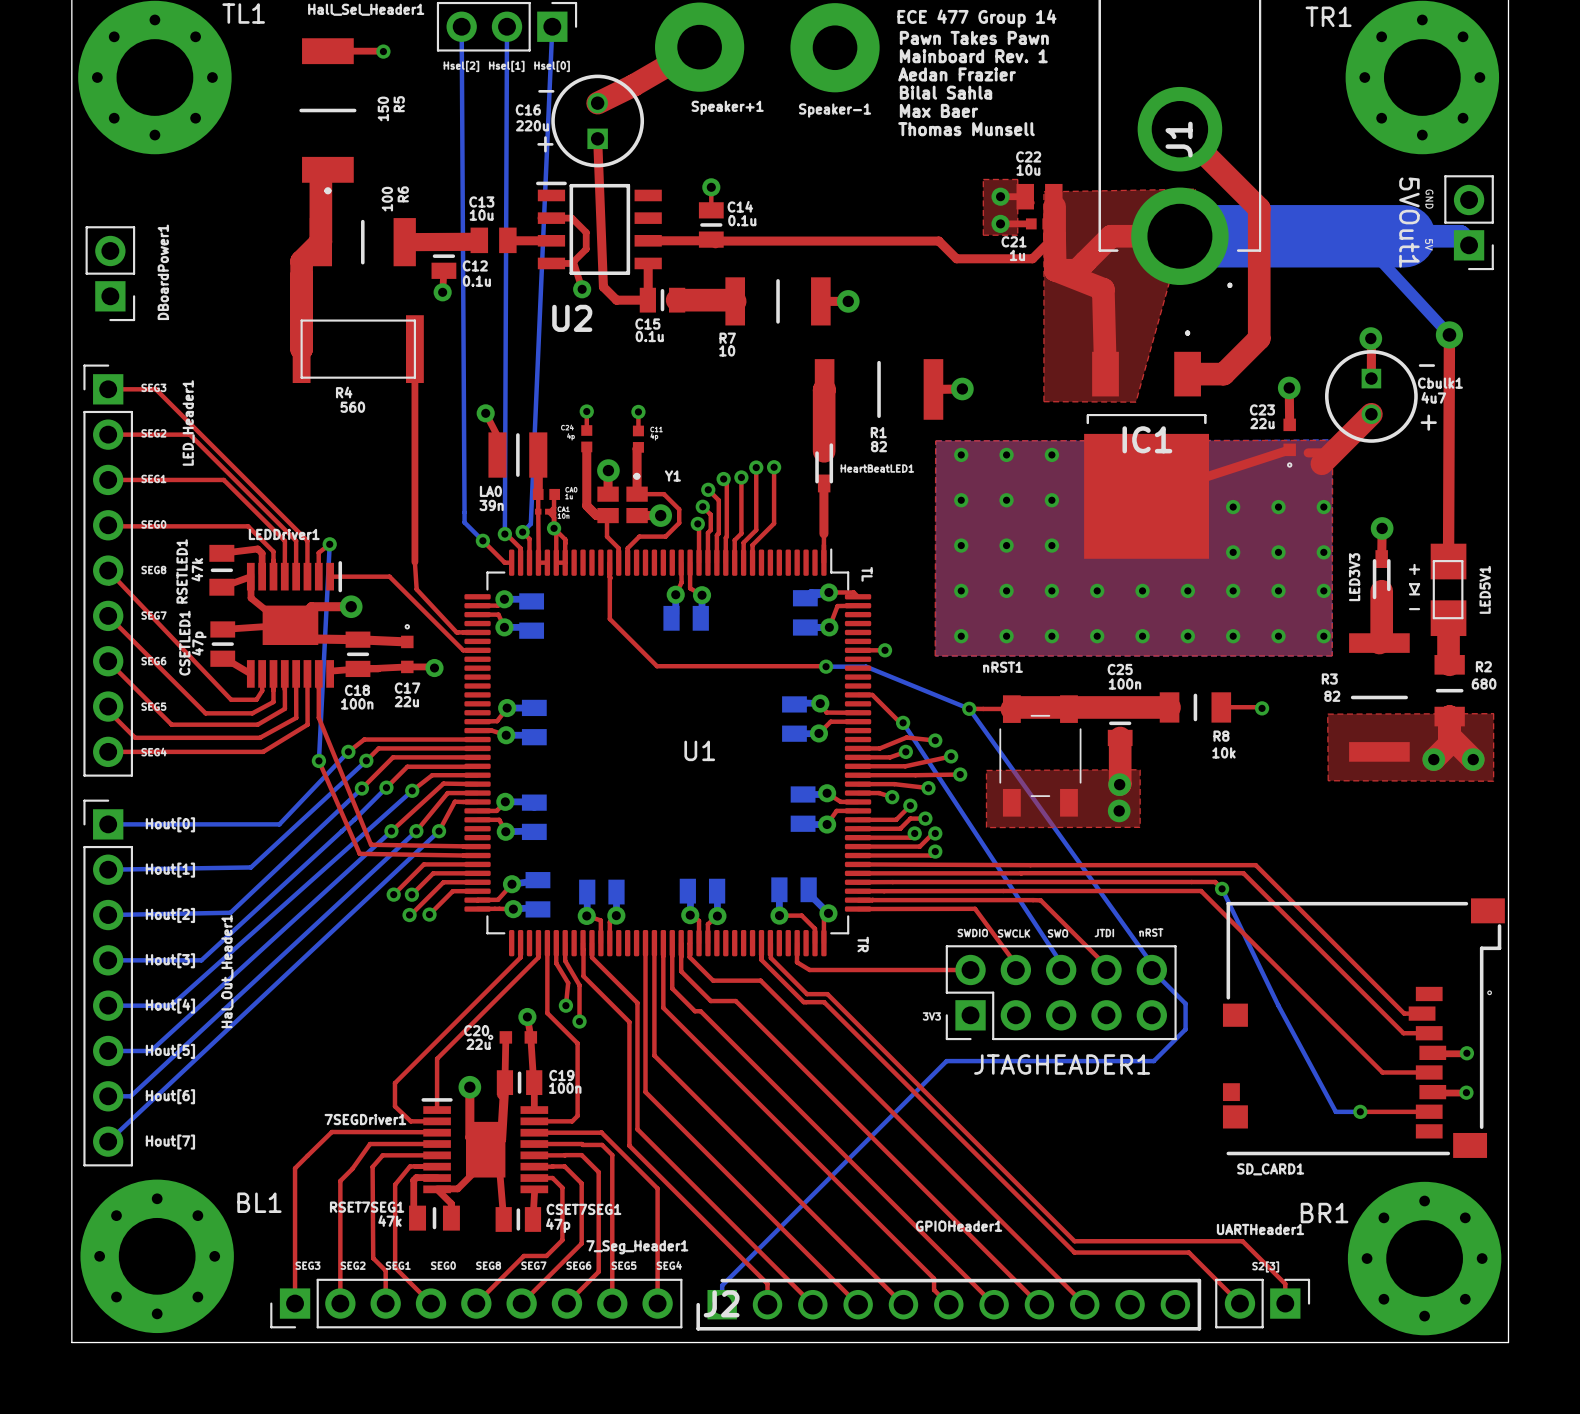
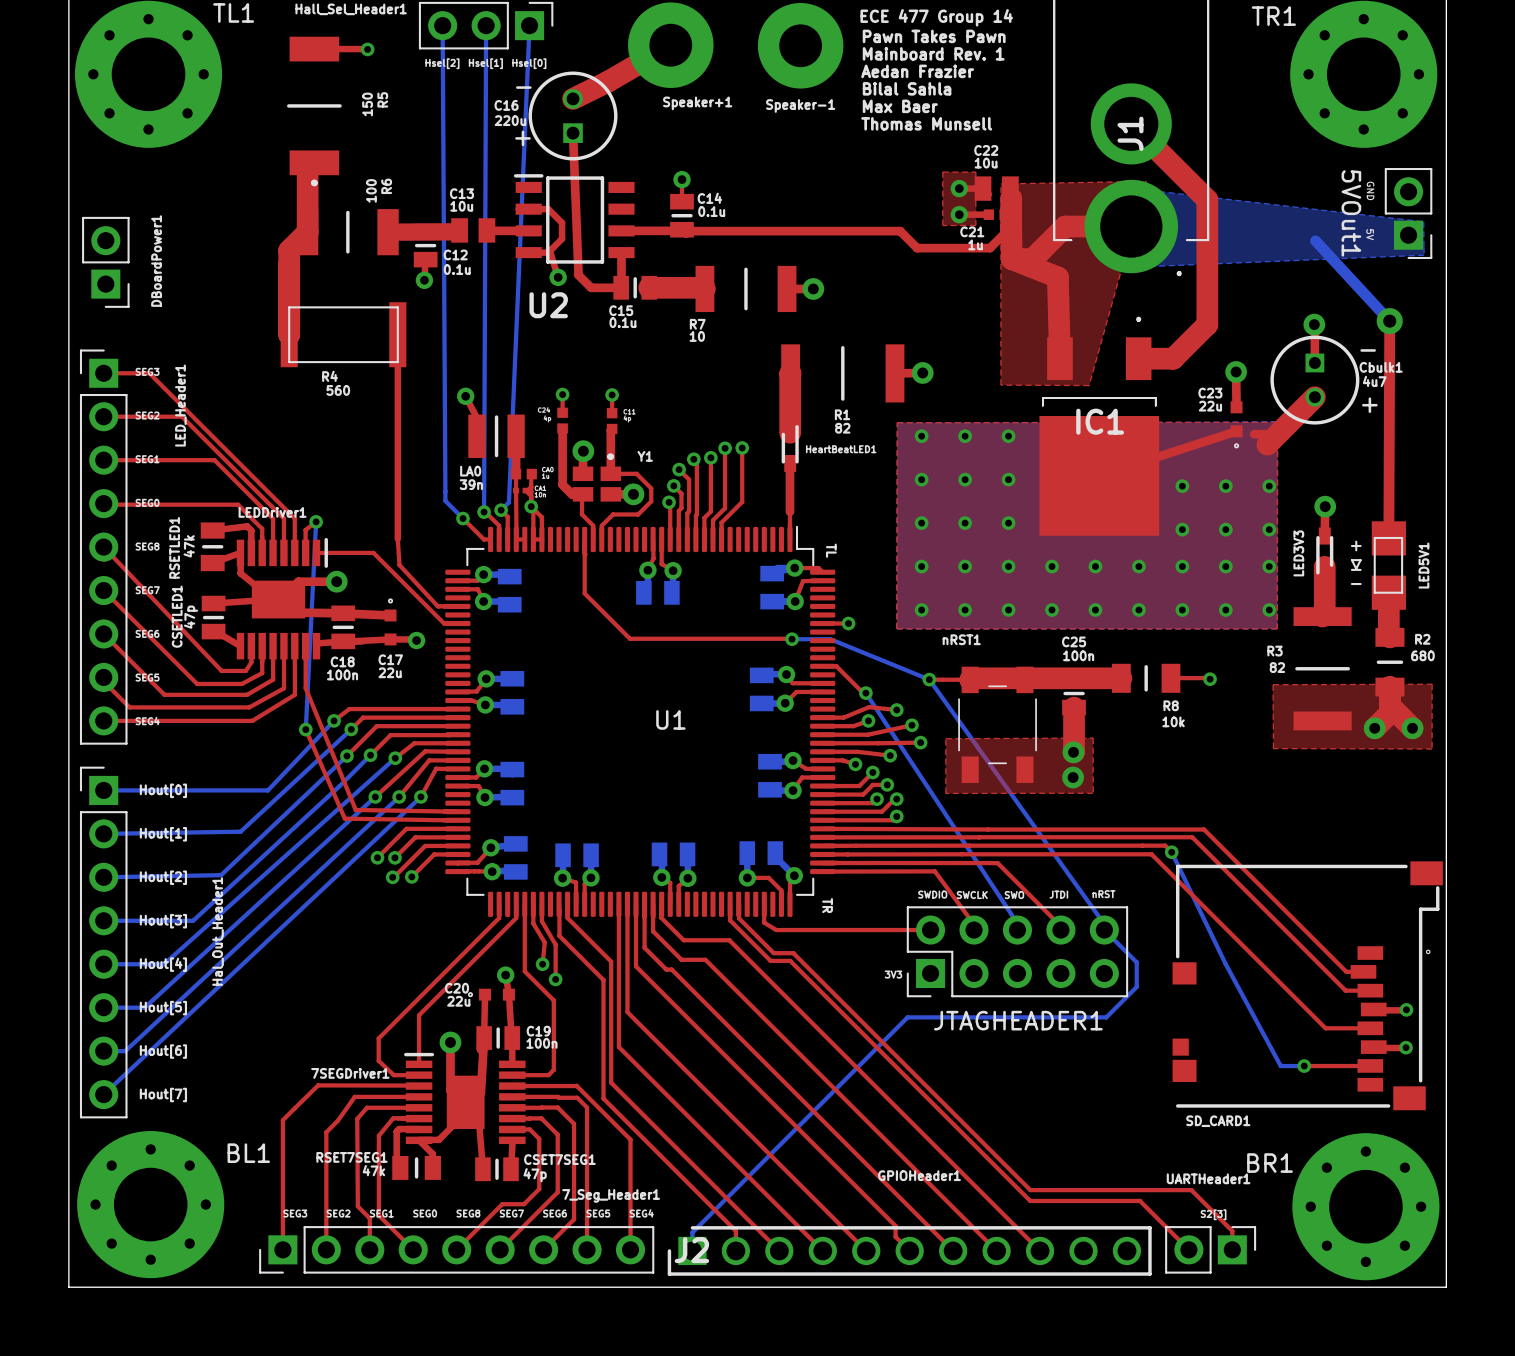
bottom zone outline: none -> (1130, 188) (1129, 267) (1424, 255) (1423, 221) (1130, 188)
bottom track: (1179, 236) (1460, 236) (1469, 245) -> none

